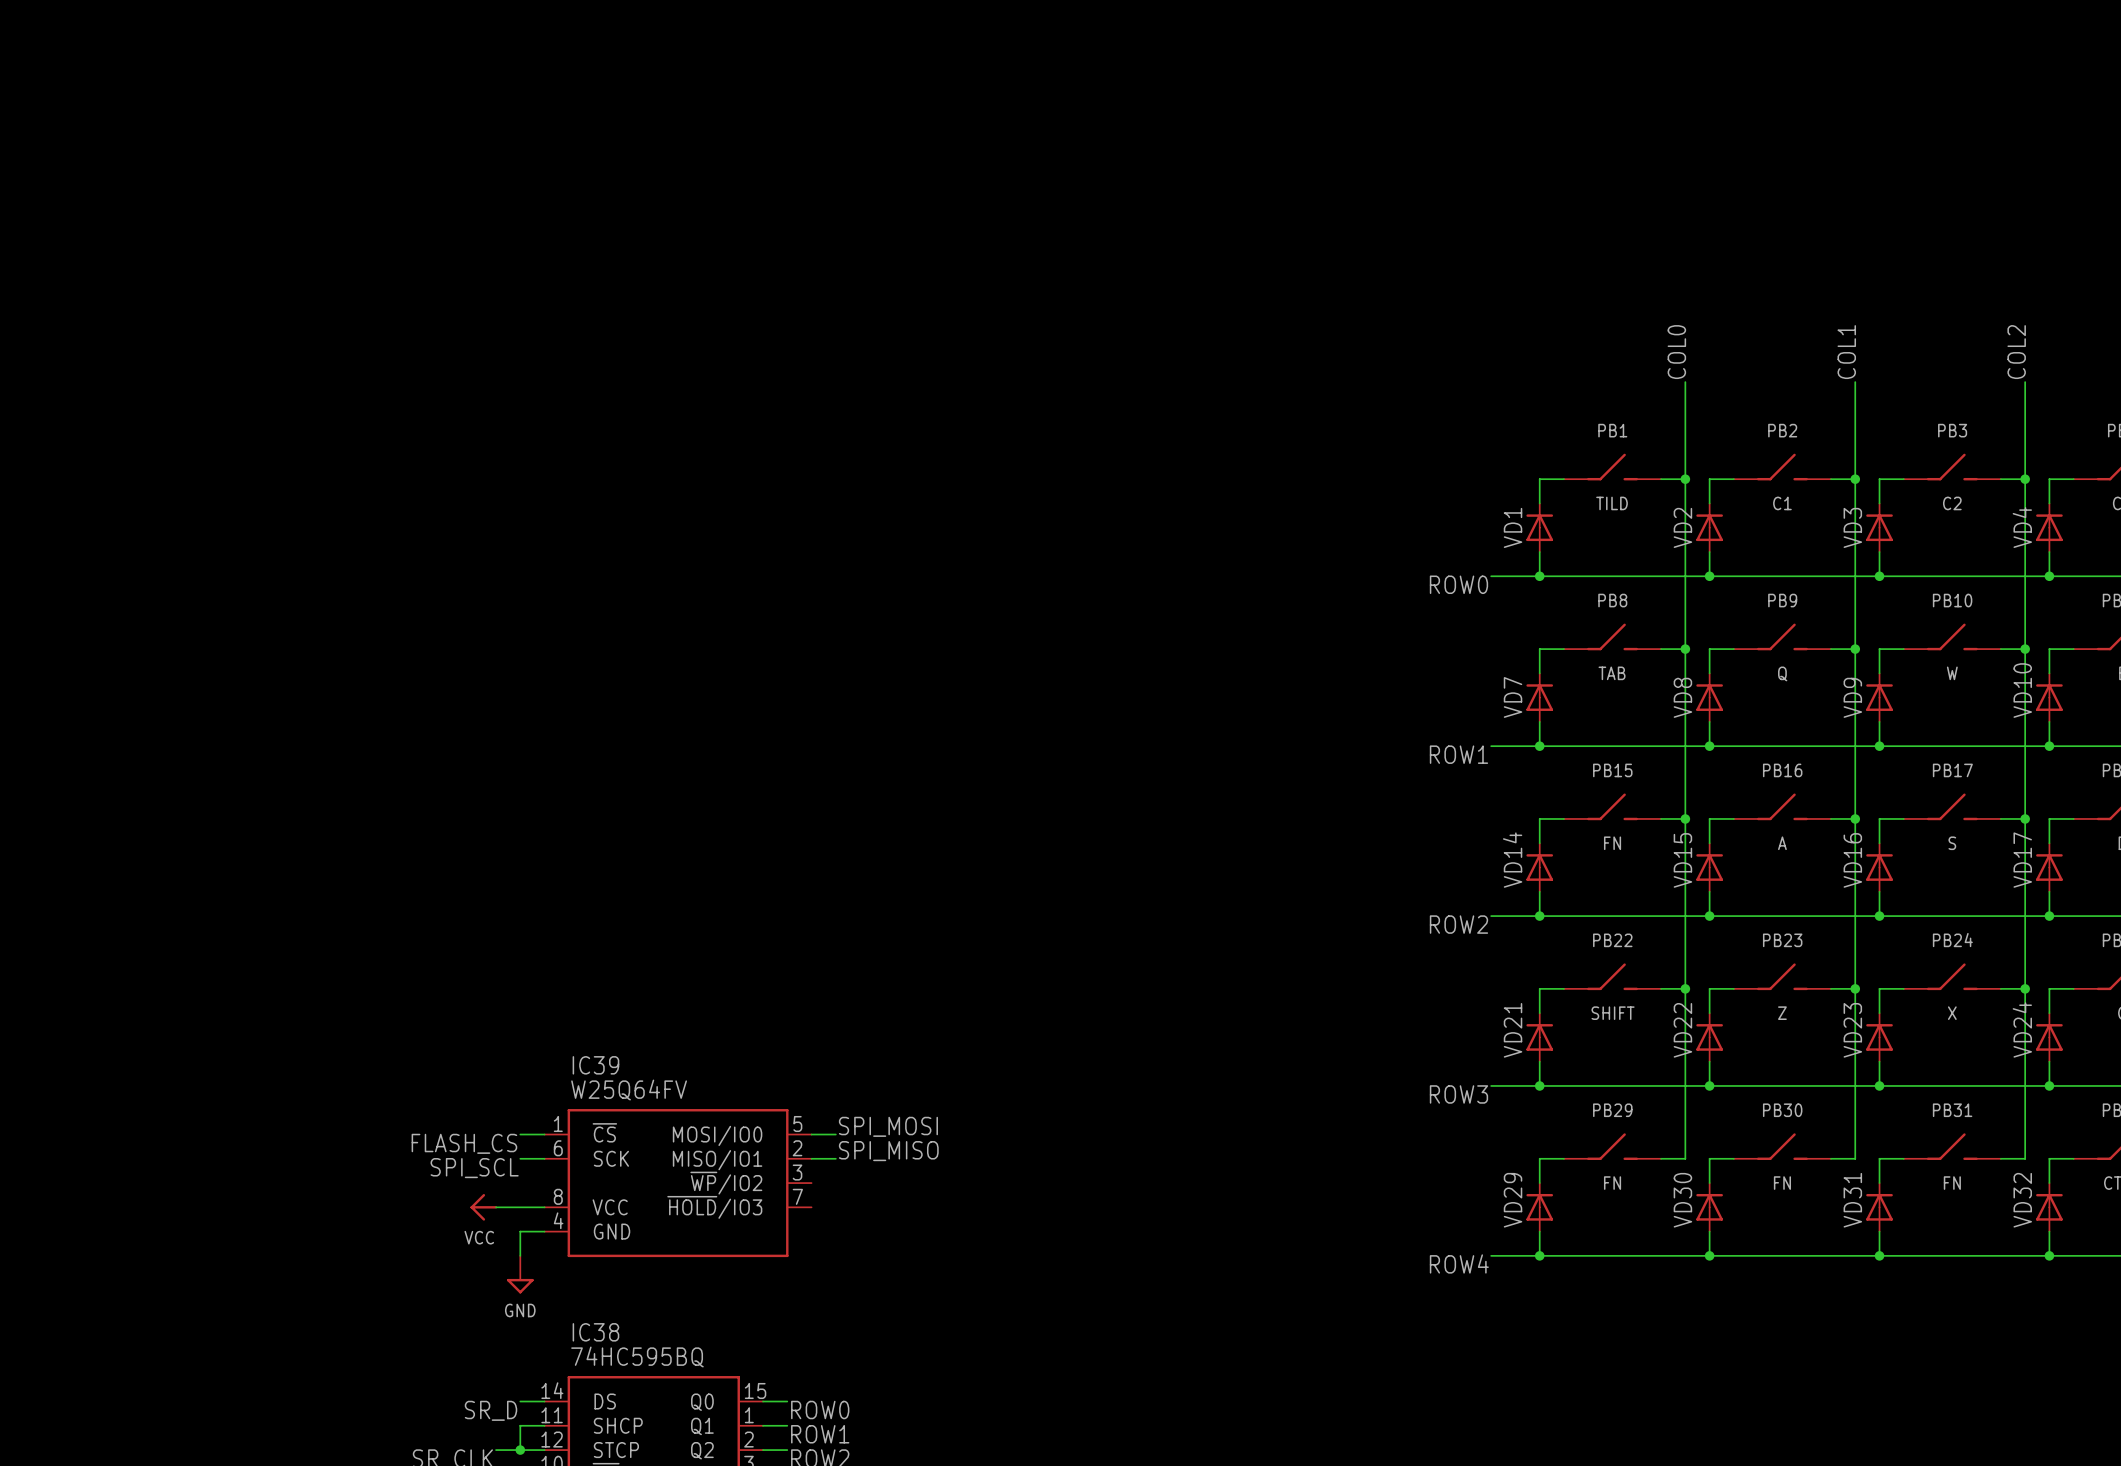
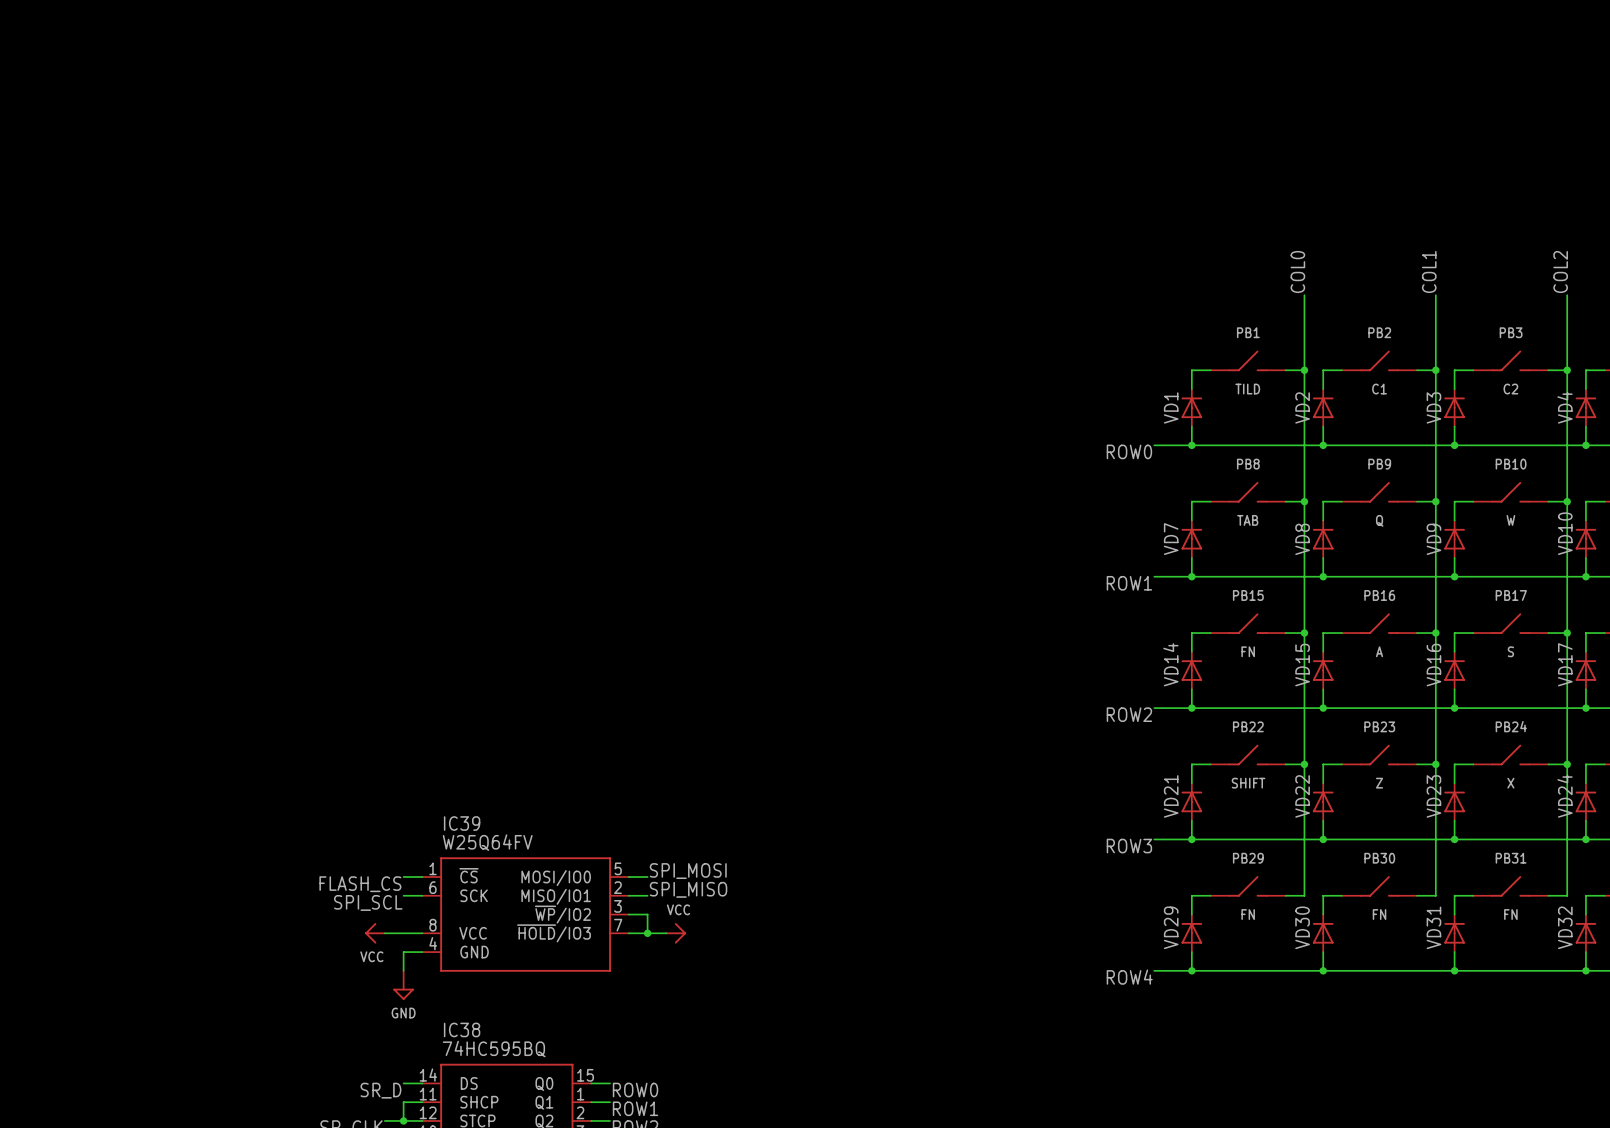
wire: none -> (628, 914) (647, 914) (647, 933)
wire: none -> (628, 933) (666, 933)
junction: none -> (647, 933)
power symbol: none -> VCC (675, 933)

